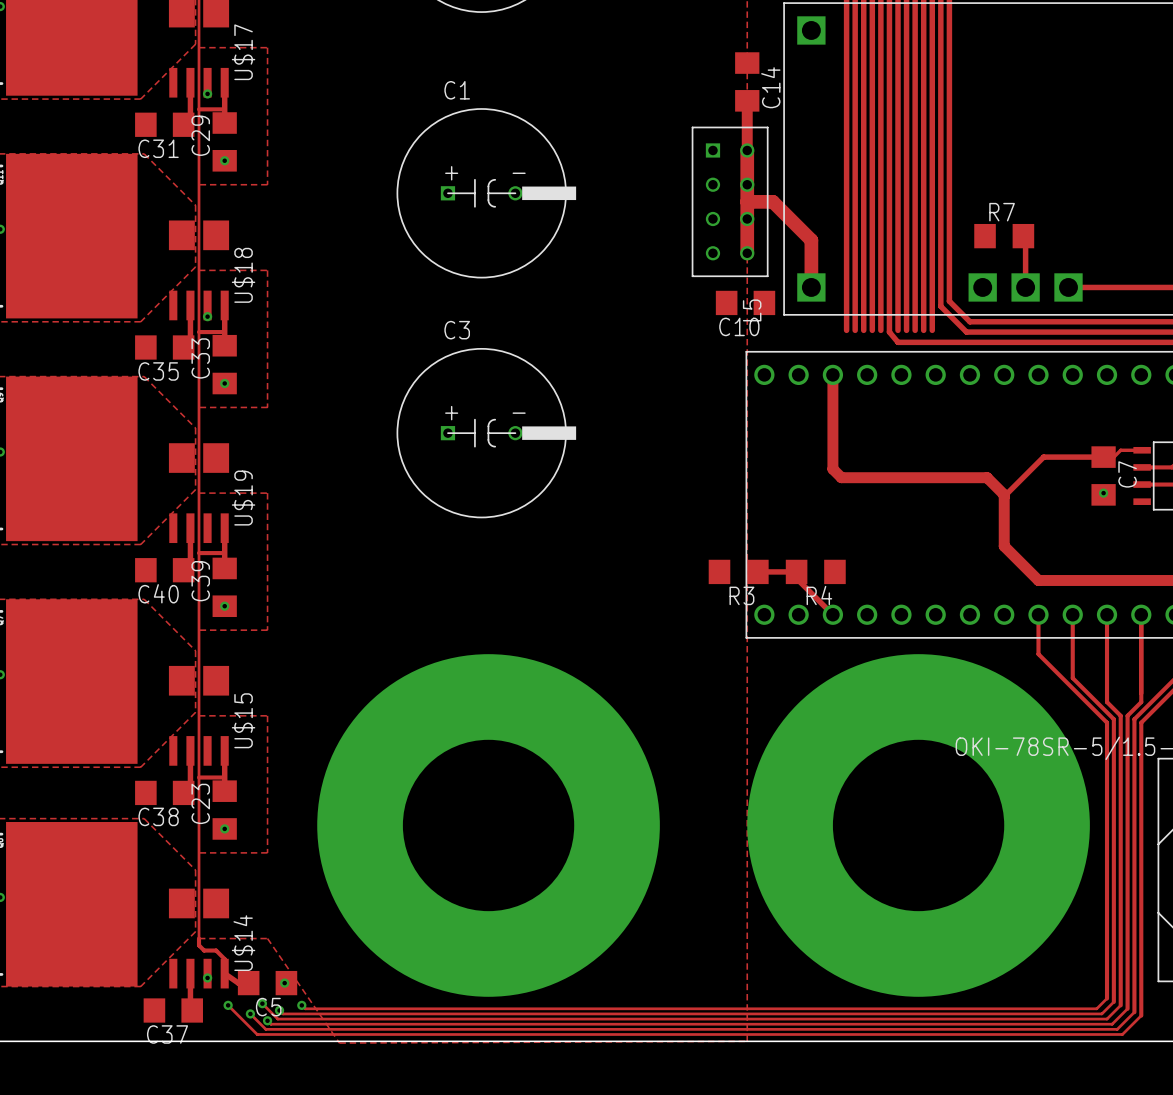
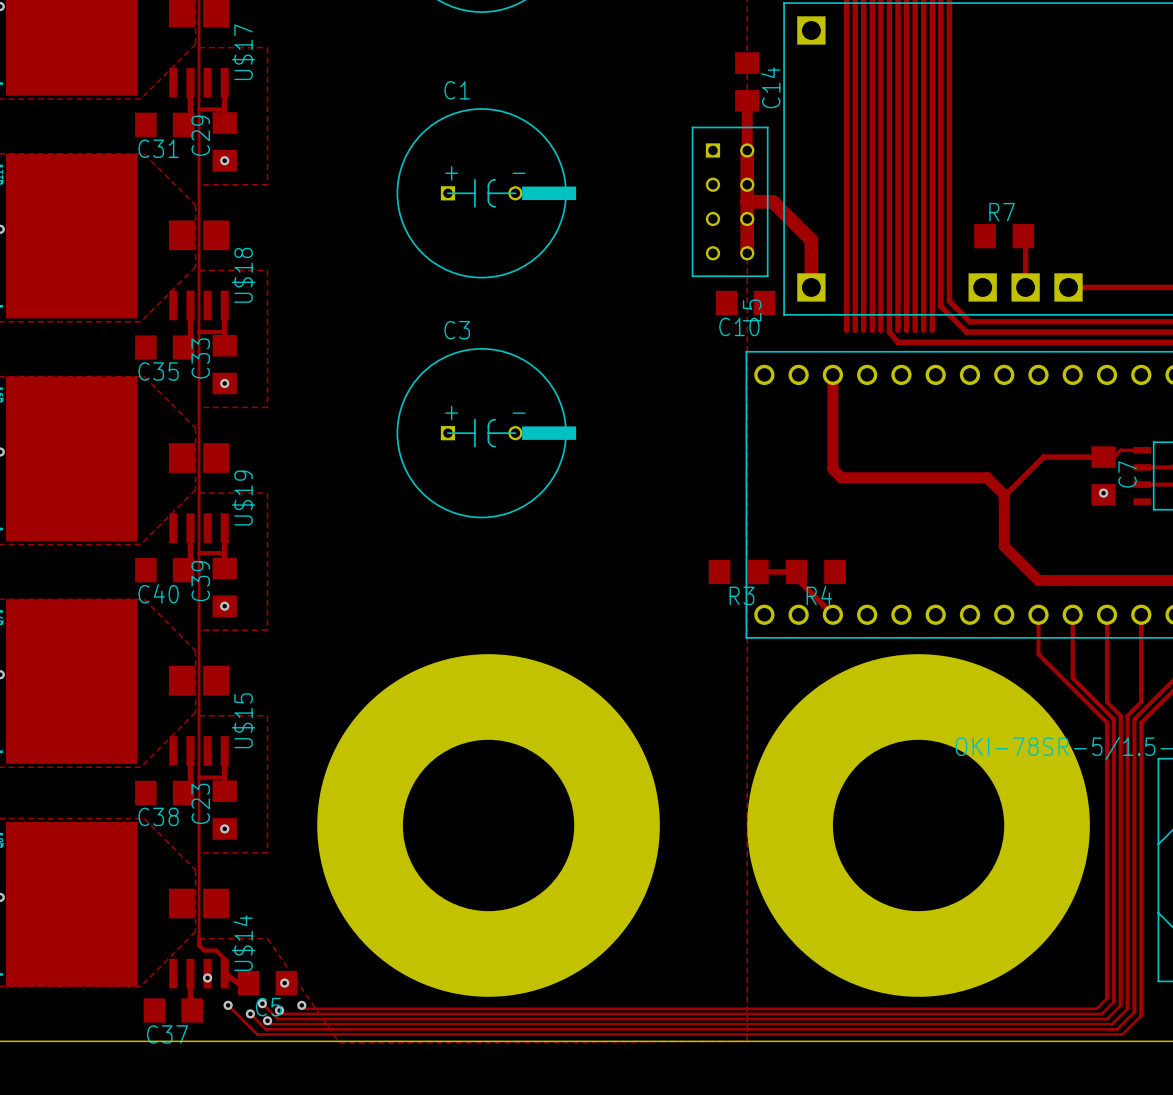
via: (207, 93) -> none
via: (207, 316) -> none

